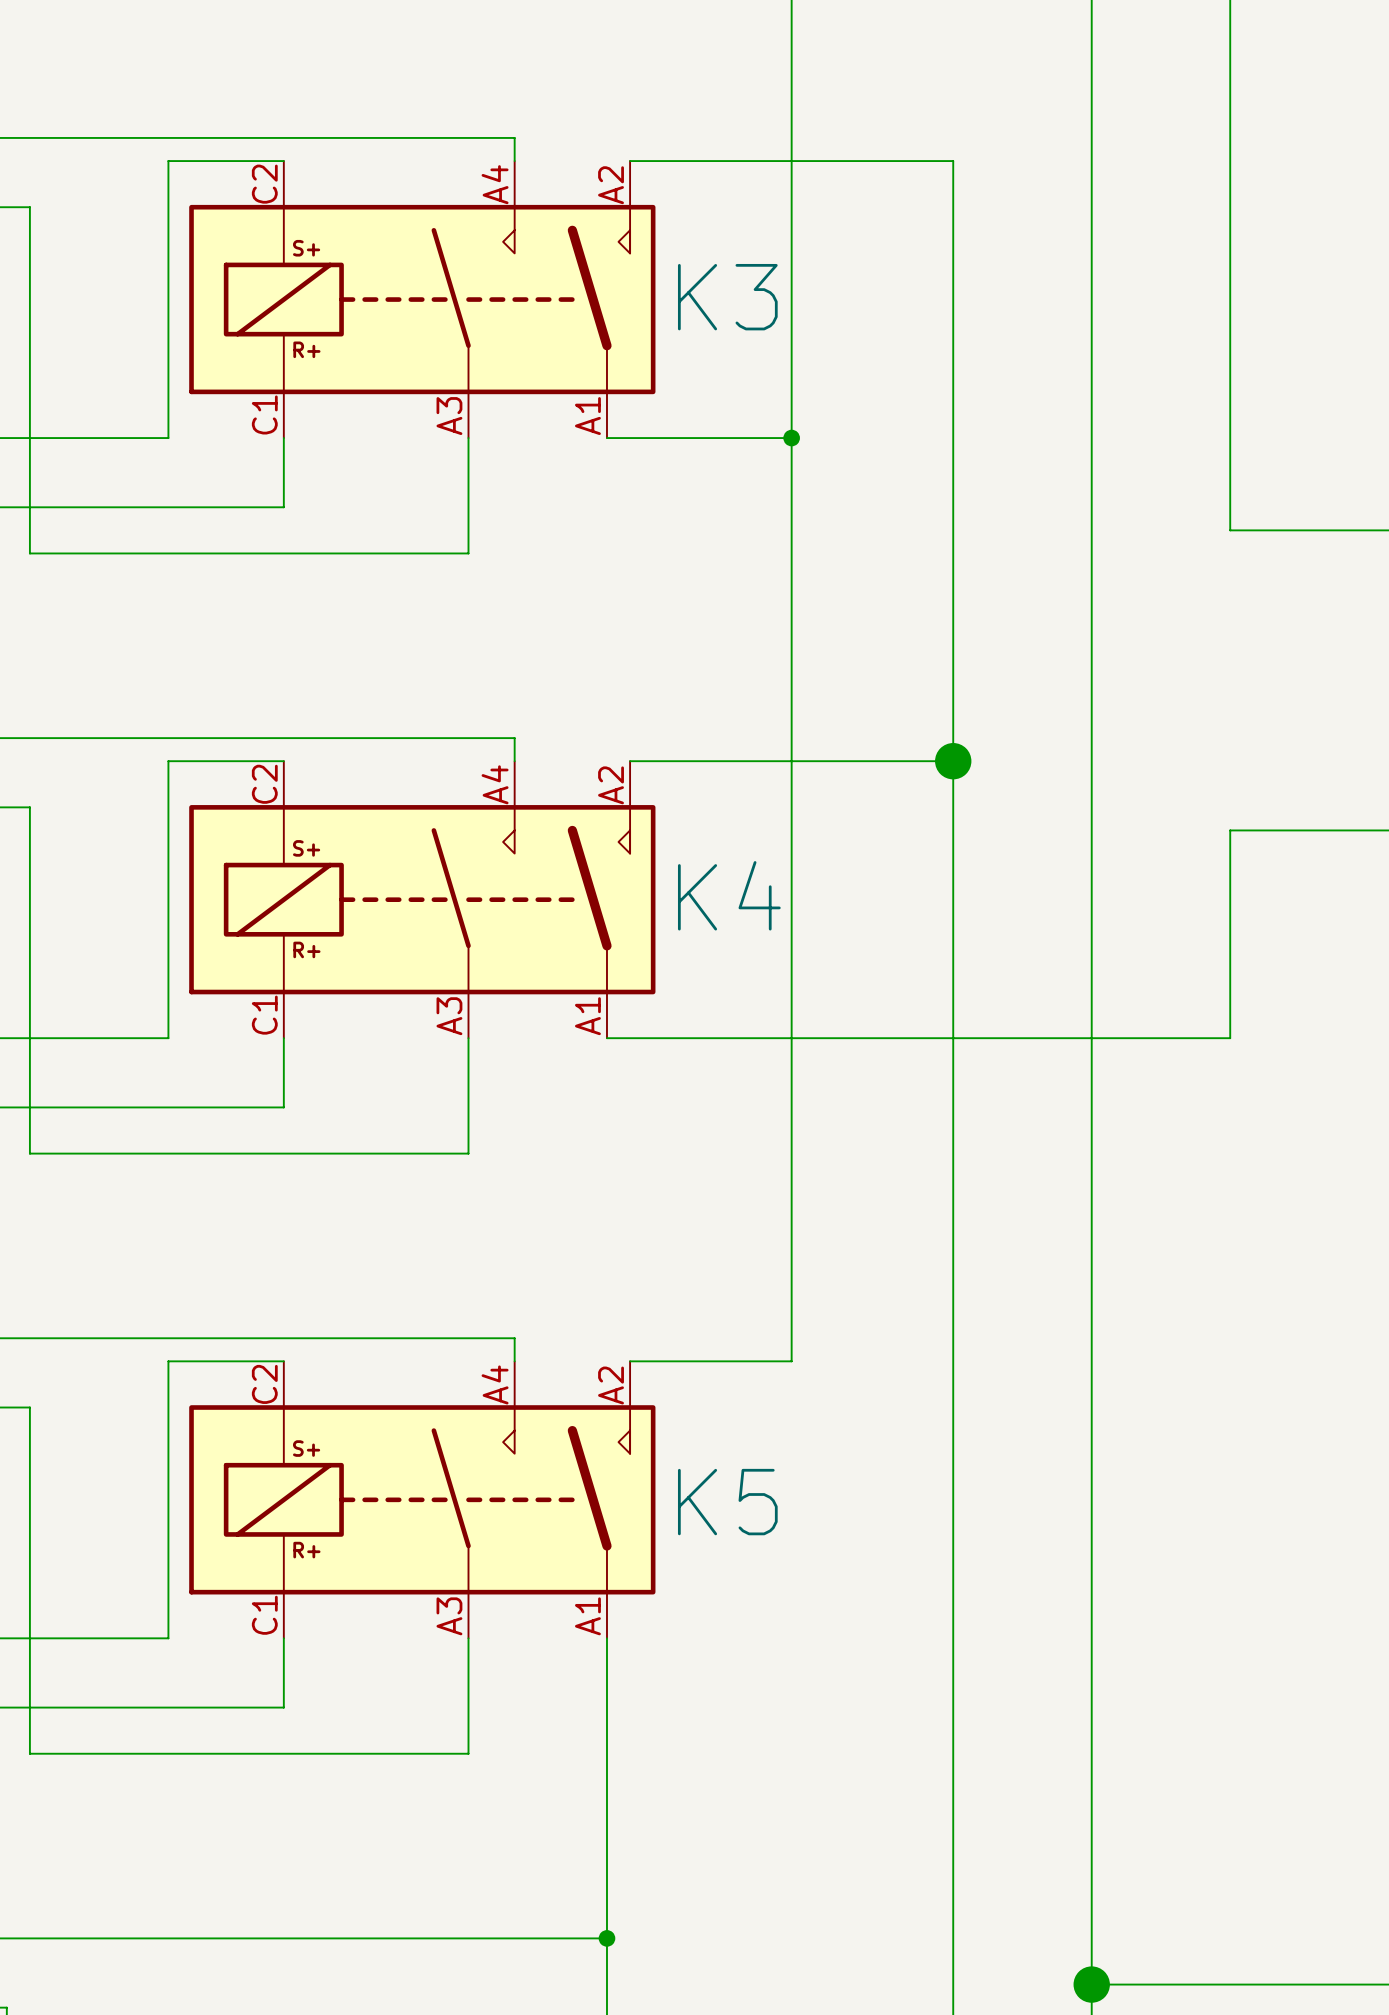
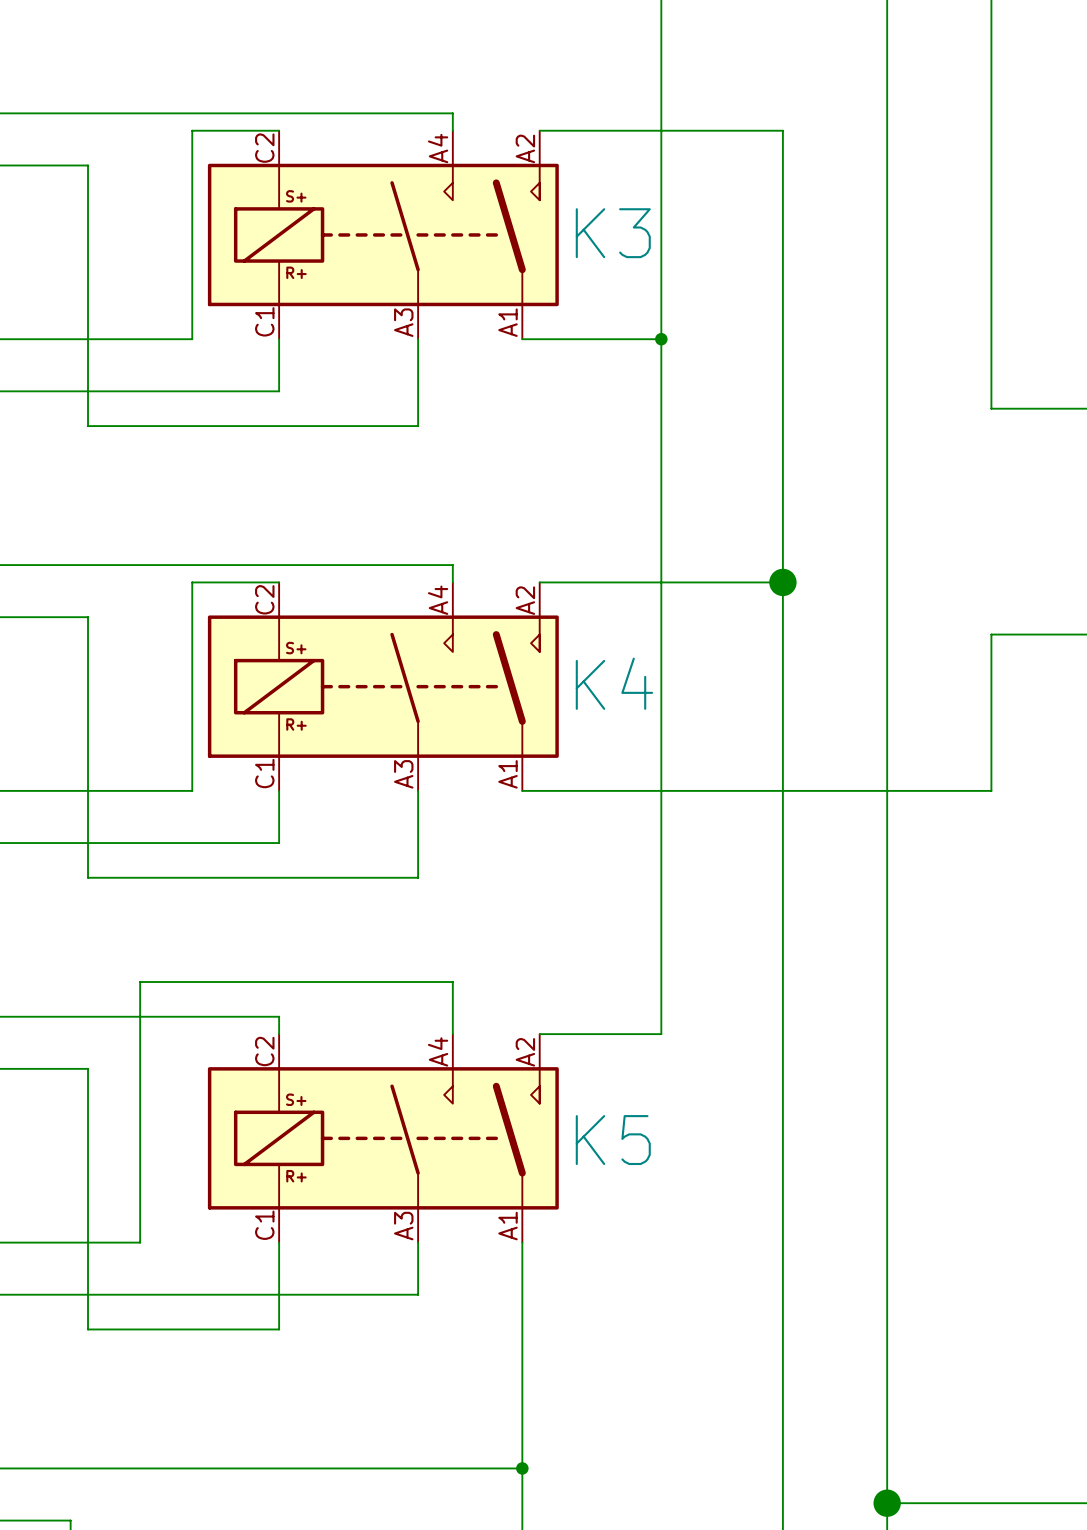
wire: (283, 1338) (514, 1338) -> (279, 1016) (279, 1034)
wire: (283, 1361) (168, 1361) (168, 1638) (99, 1638) -> (452, 1016) (452, 982) (140, 982) (140, 1242)
wire: (468, 1707) (468, 1753) (283, 1753) -> (418, 1294) (279, 1294) (279, 1329)

